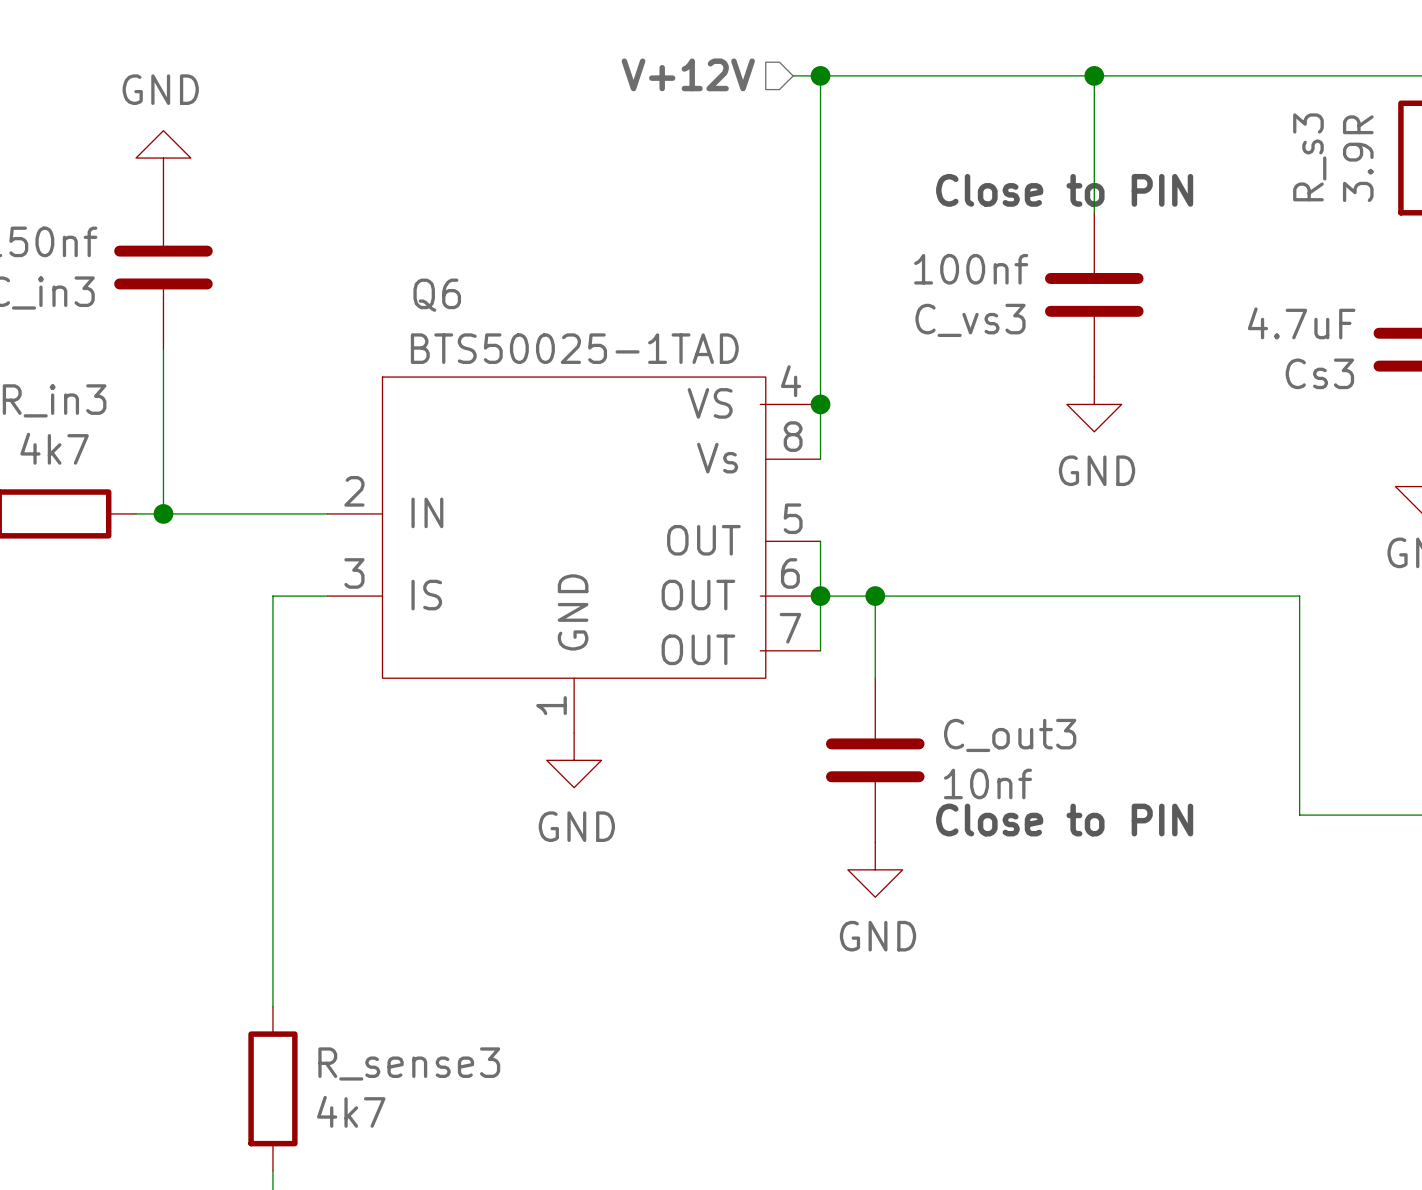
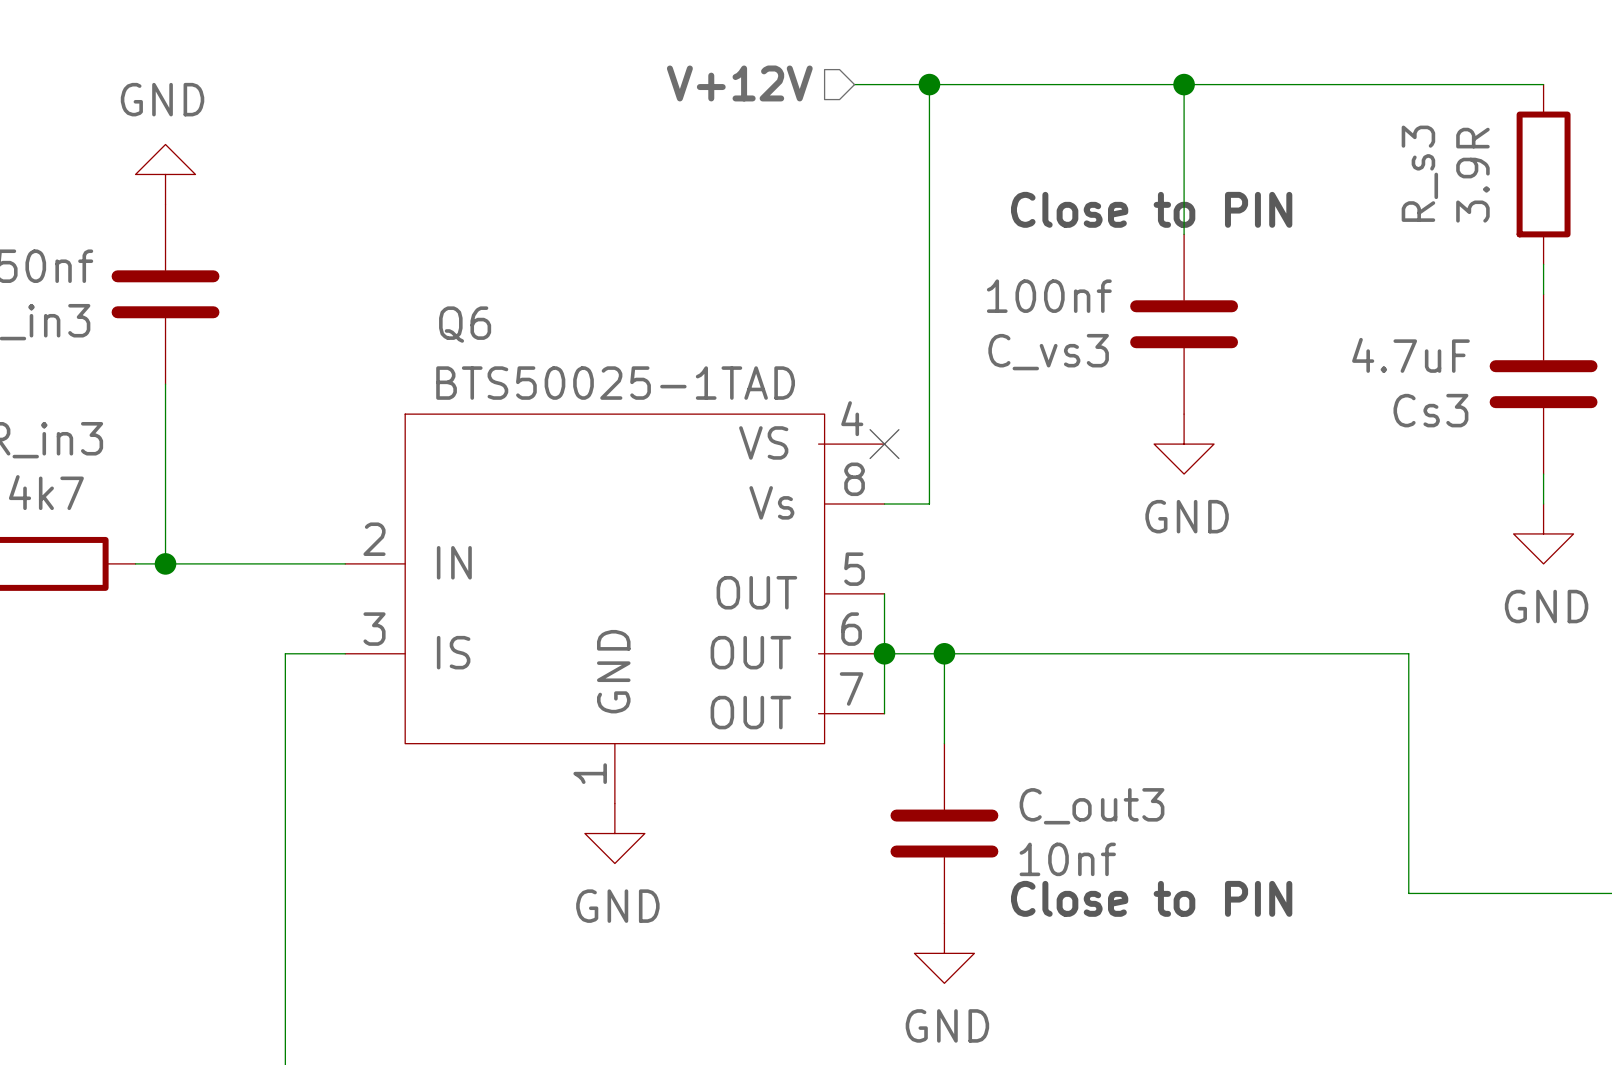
wire: (820, 75) (820, 459) -> (929, 84) (929, 504) (884, 504)
junction position: (820, 75) -> (929, 84)
junction: (820, 404) -> none
no-connect mark: none -> (884, 444)

